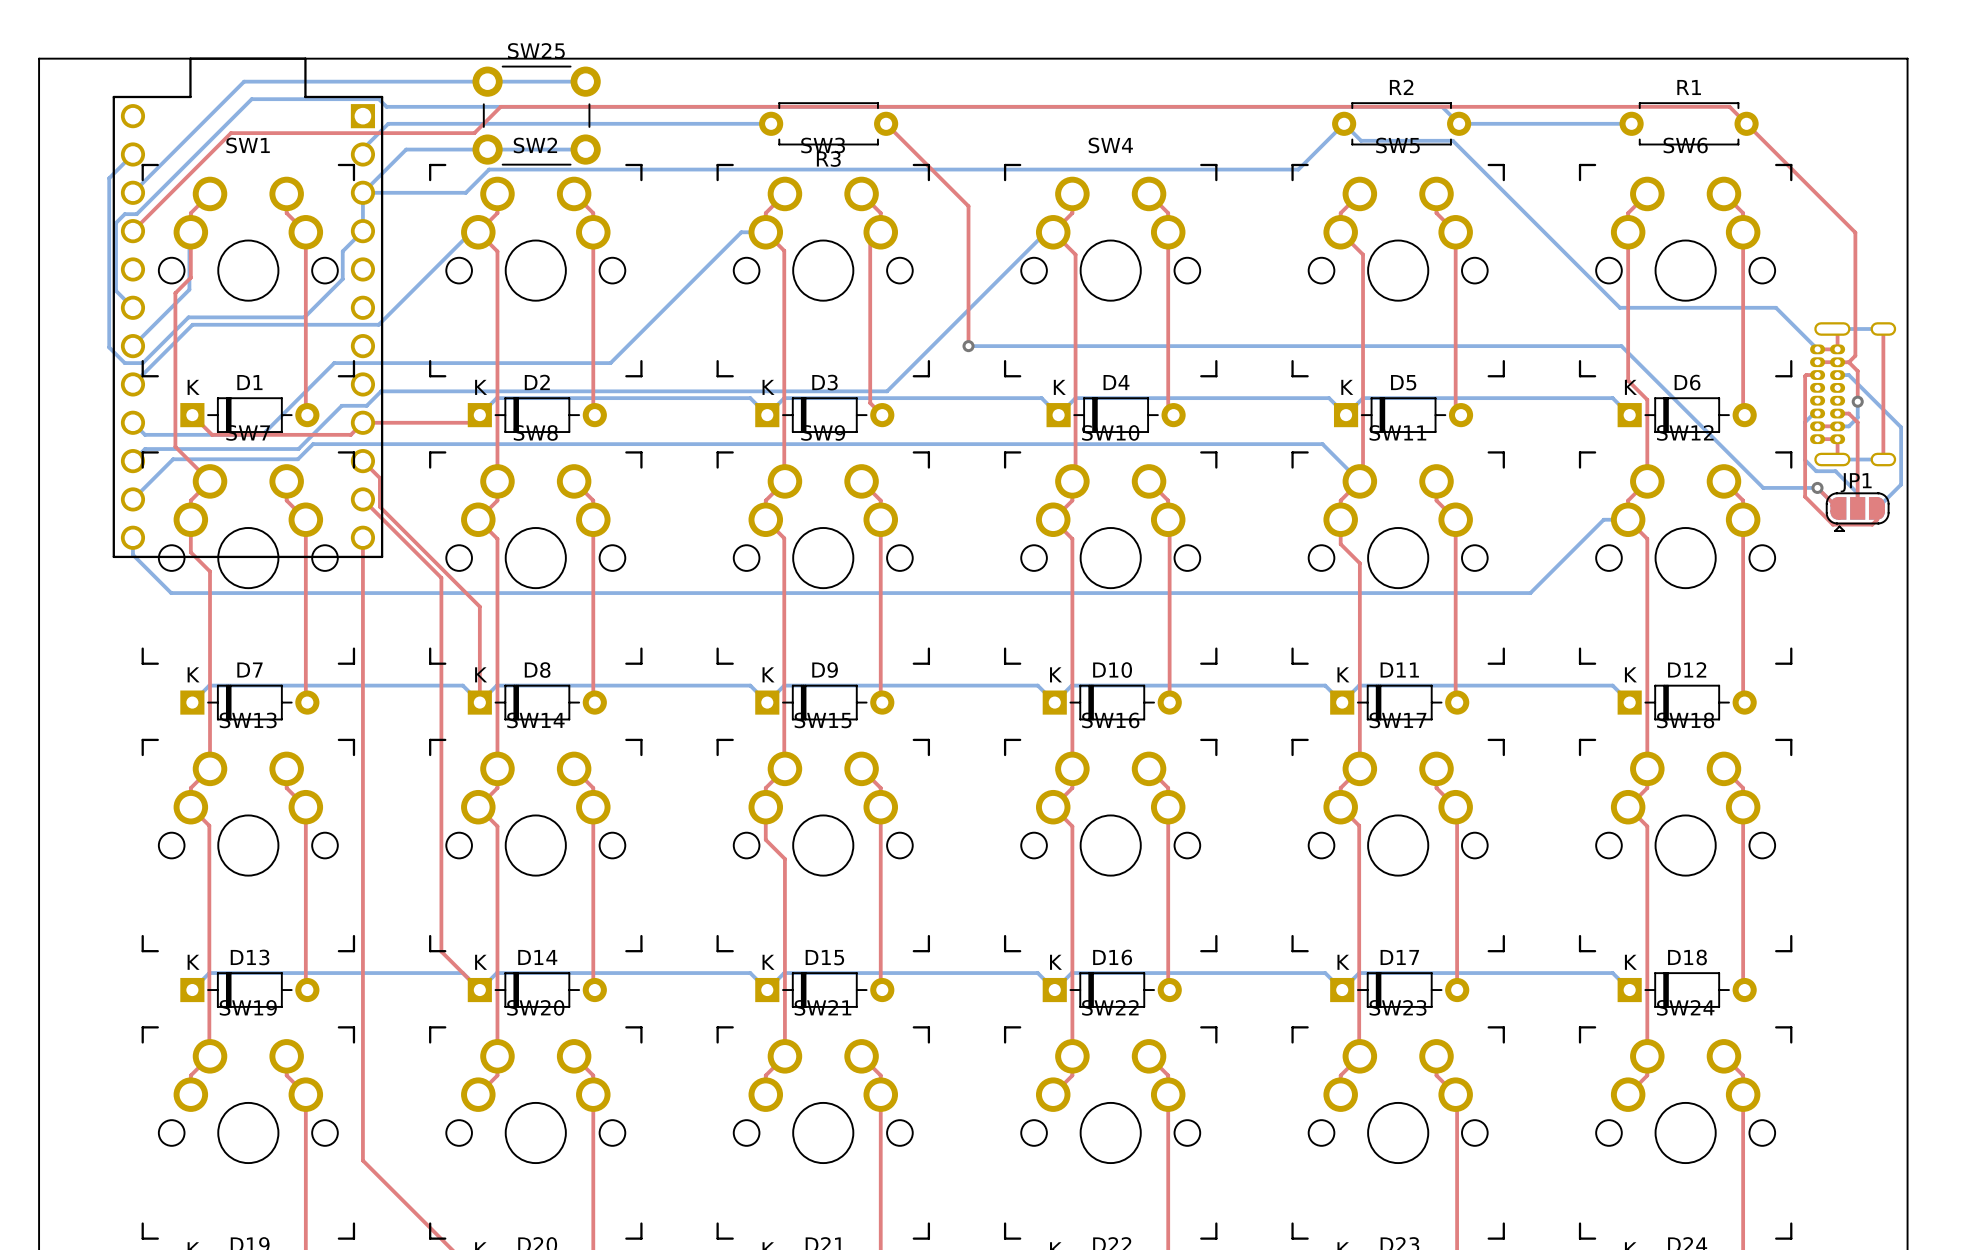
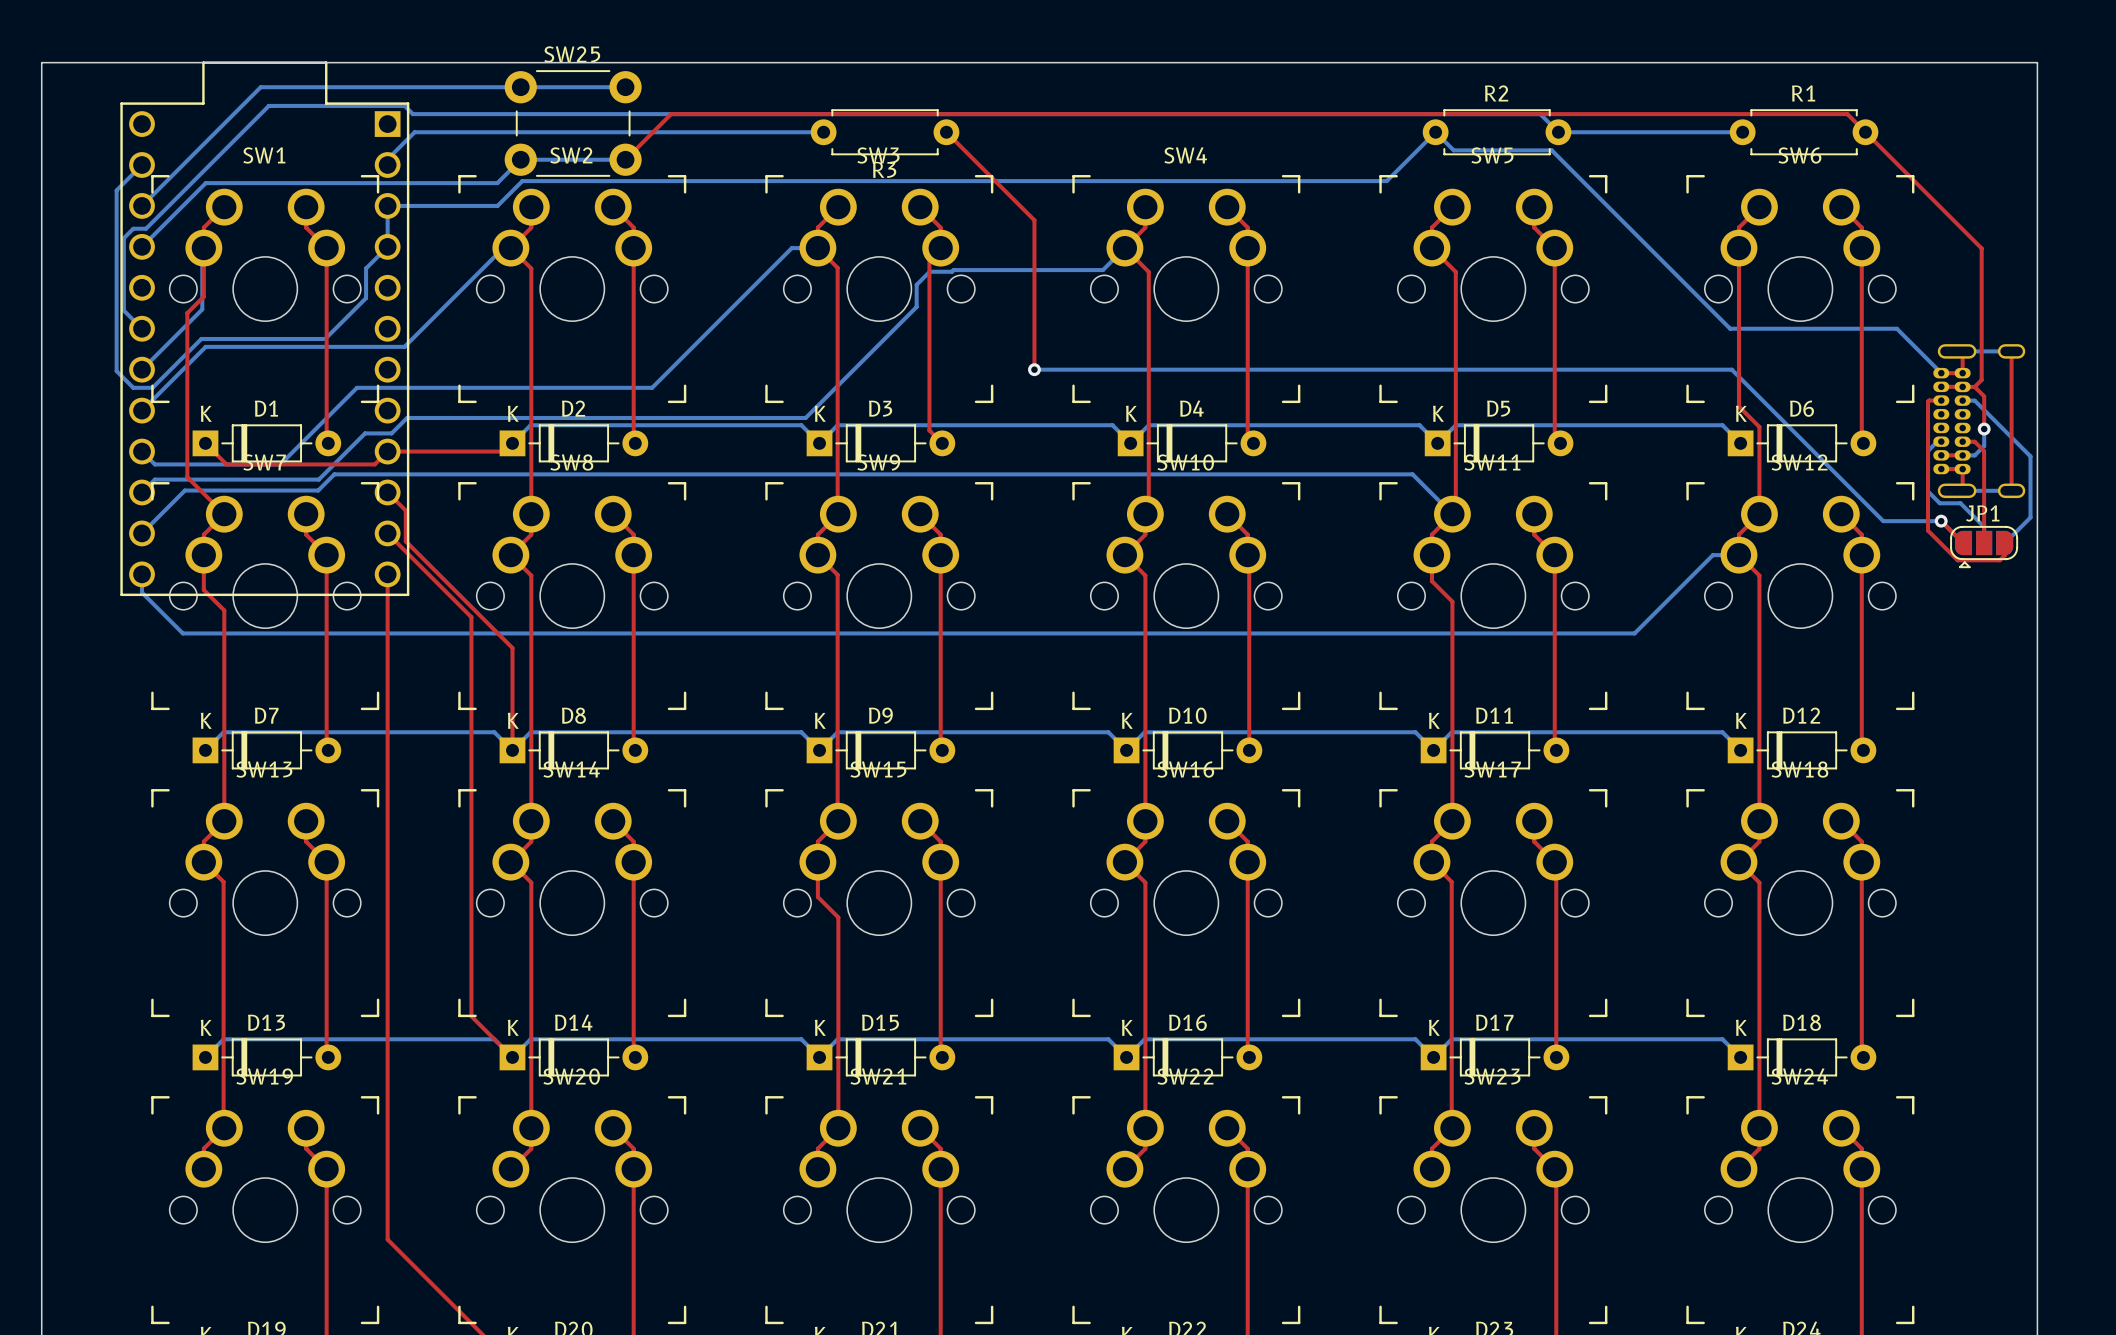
top track: (628, 106) (500, 106) (474, 133) (230, 133) (132, 231) -> (671, 114) (625, 159)
bottom track: (487, 149) (406, 149) (362, 192) -> (520, 159) (497, 183) (205, 183) (142, 246)
bottom track: (1053, 232) (1046, 232) (887, 391) (754, 391) -> (1124, 248) (1102, 270) (929, 271) (916, 284) (916, 306) (805, 417)

